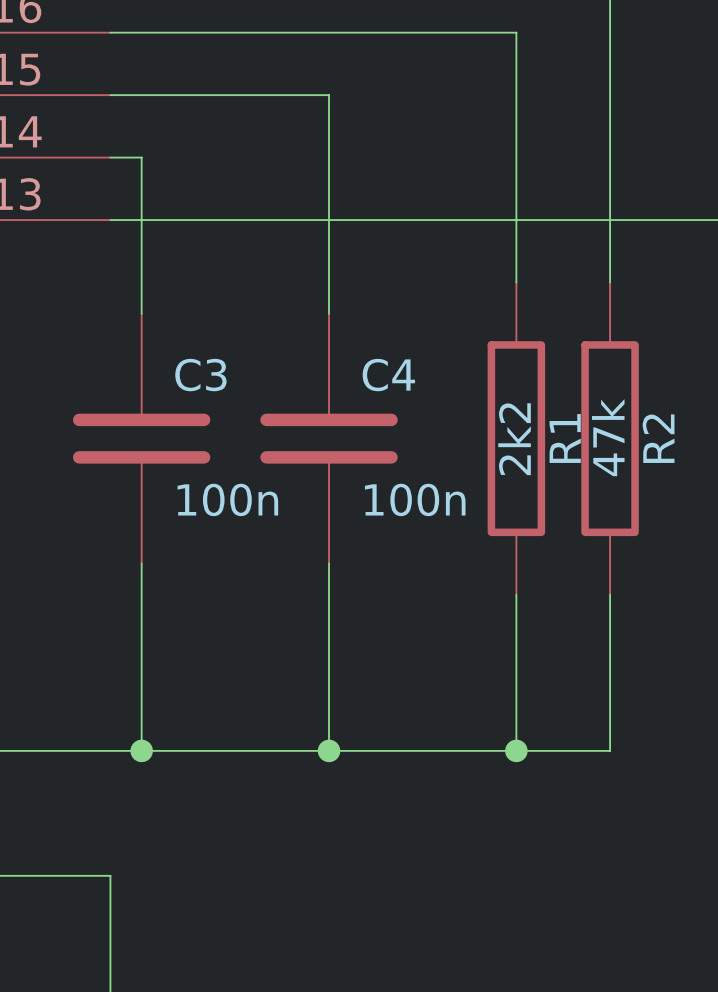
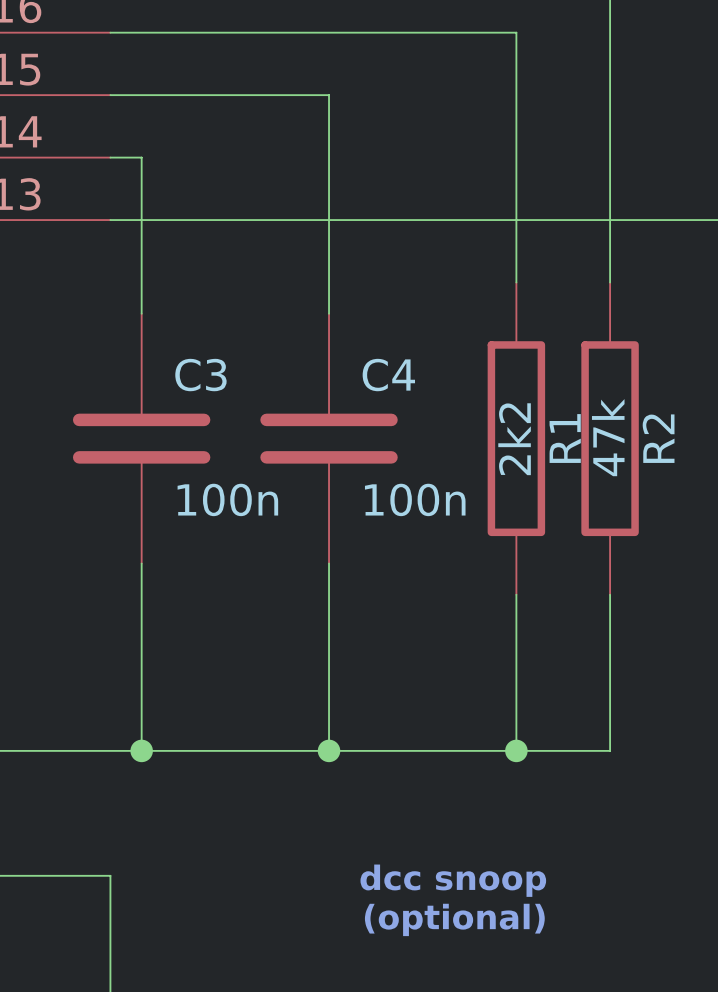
text: none -> dcc snoop (453, 880)
text: none -> (optional) (454, 919)

